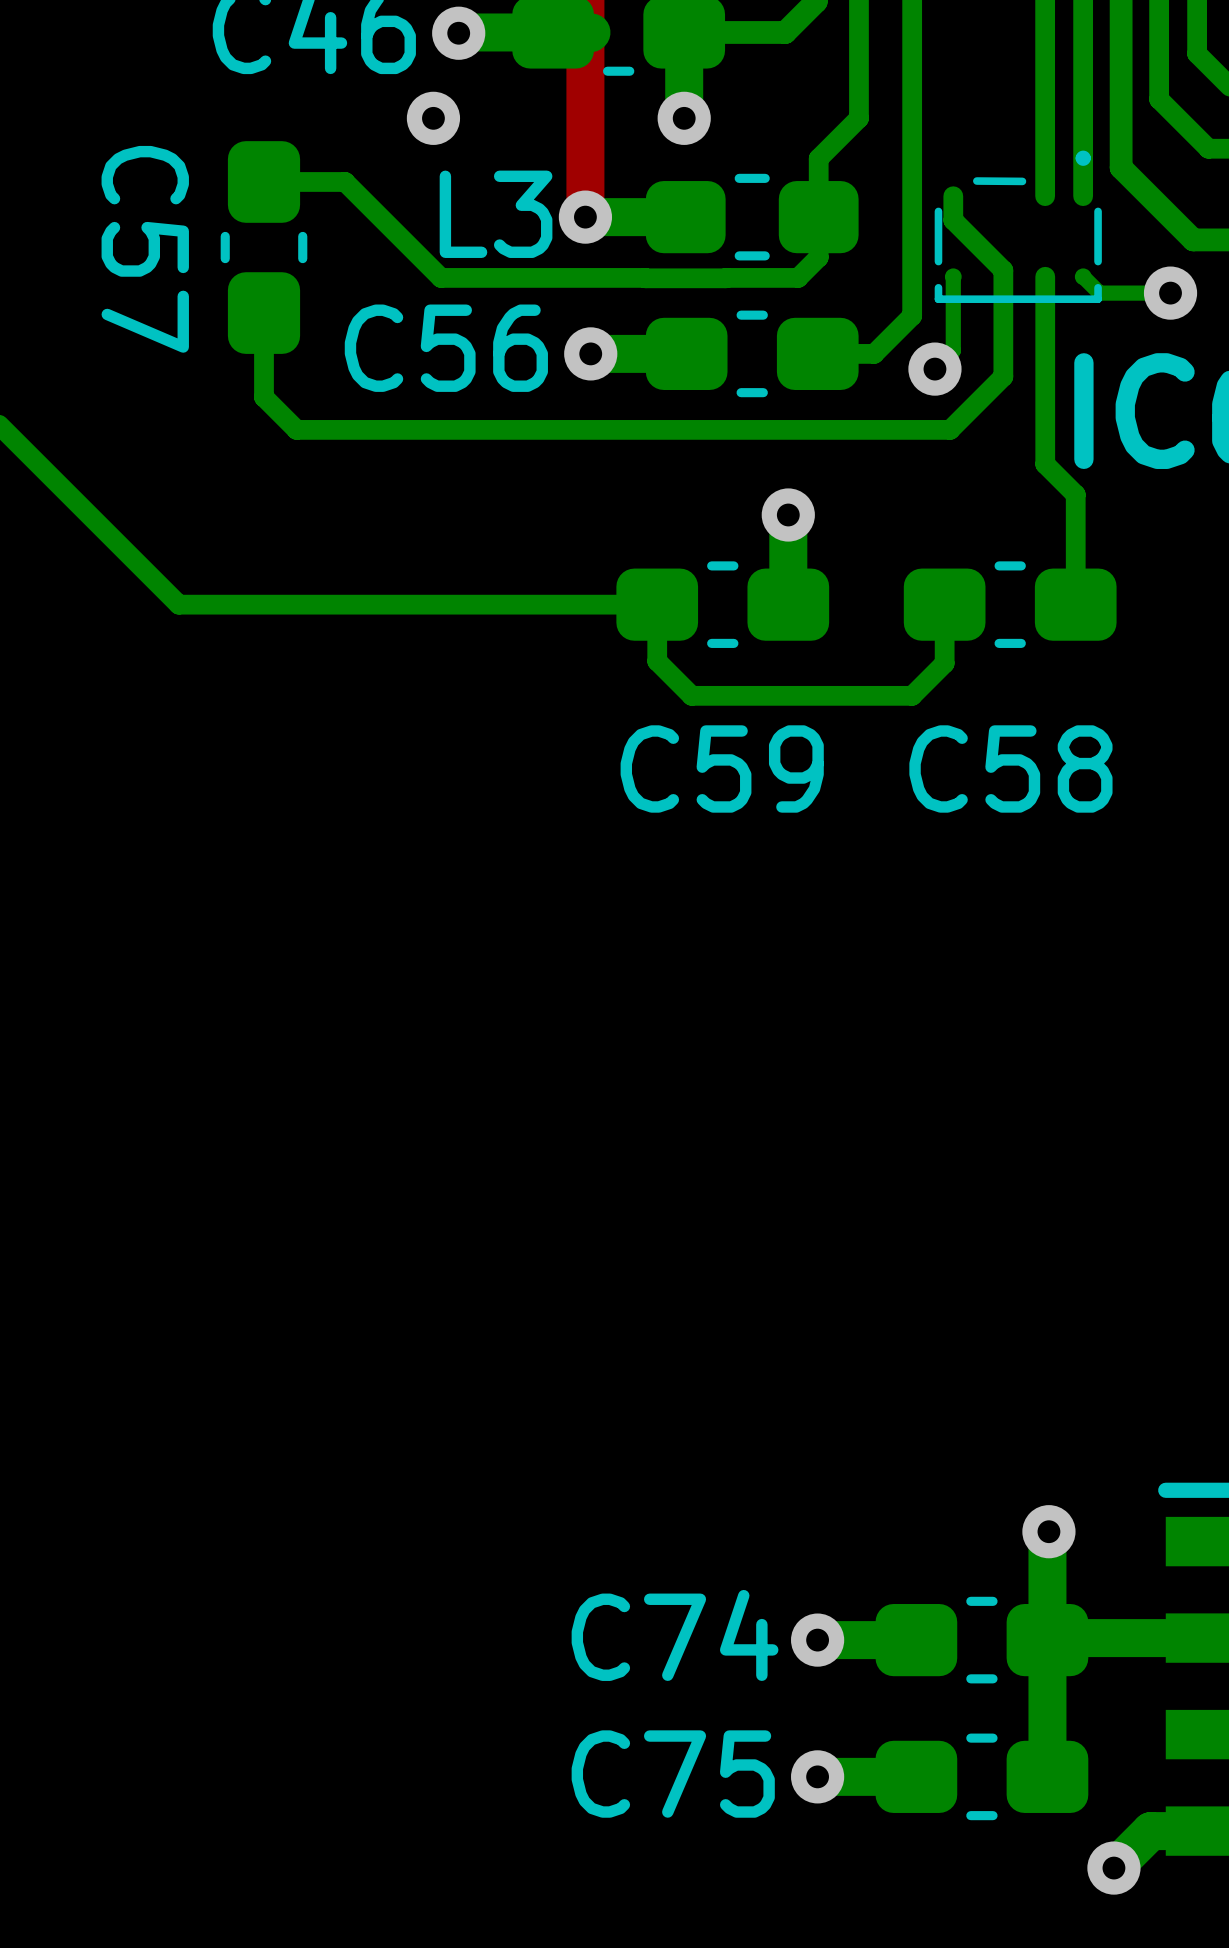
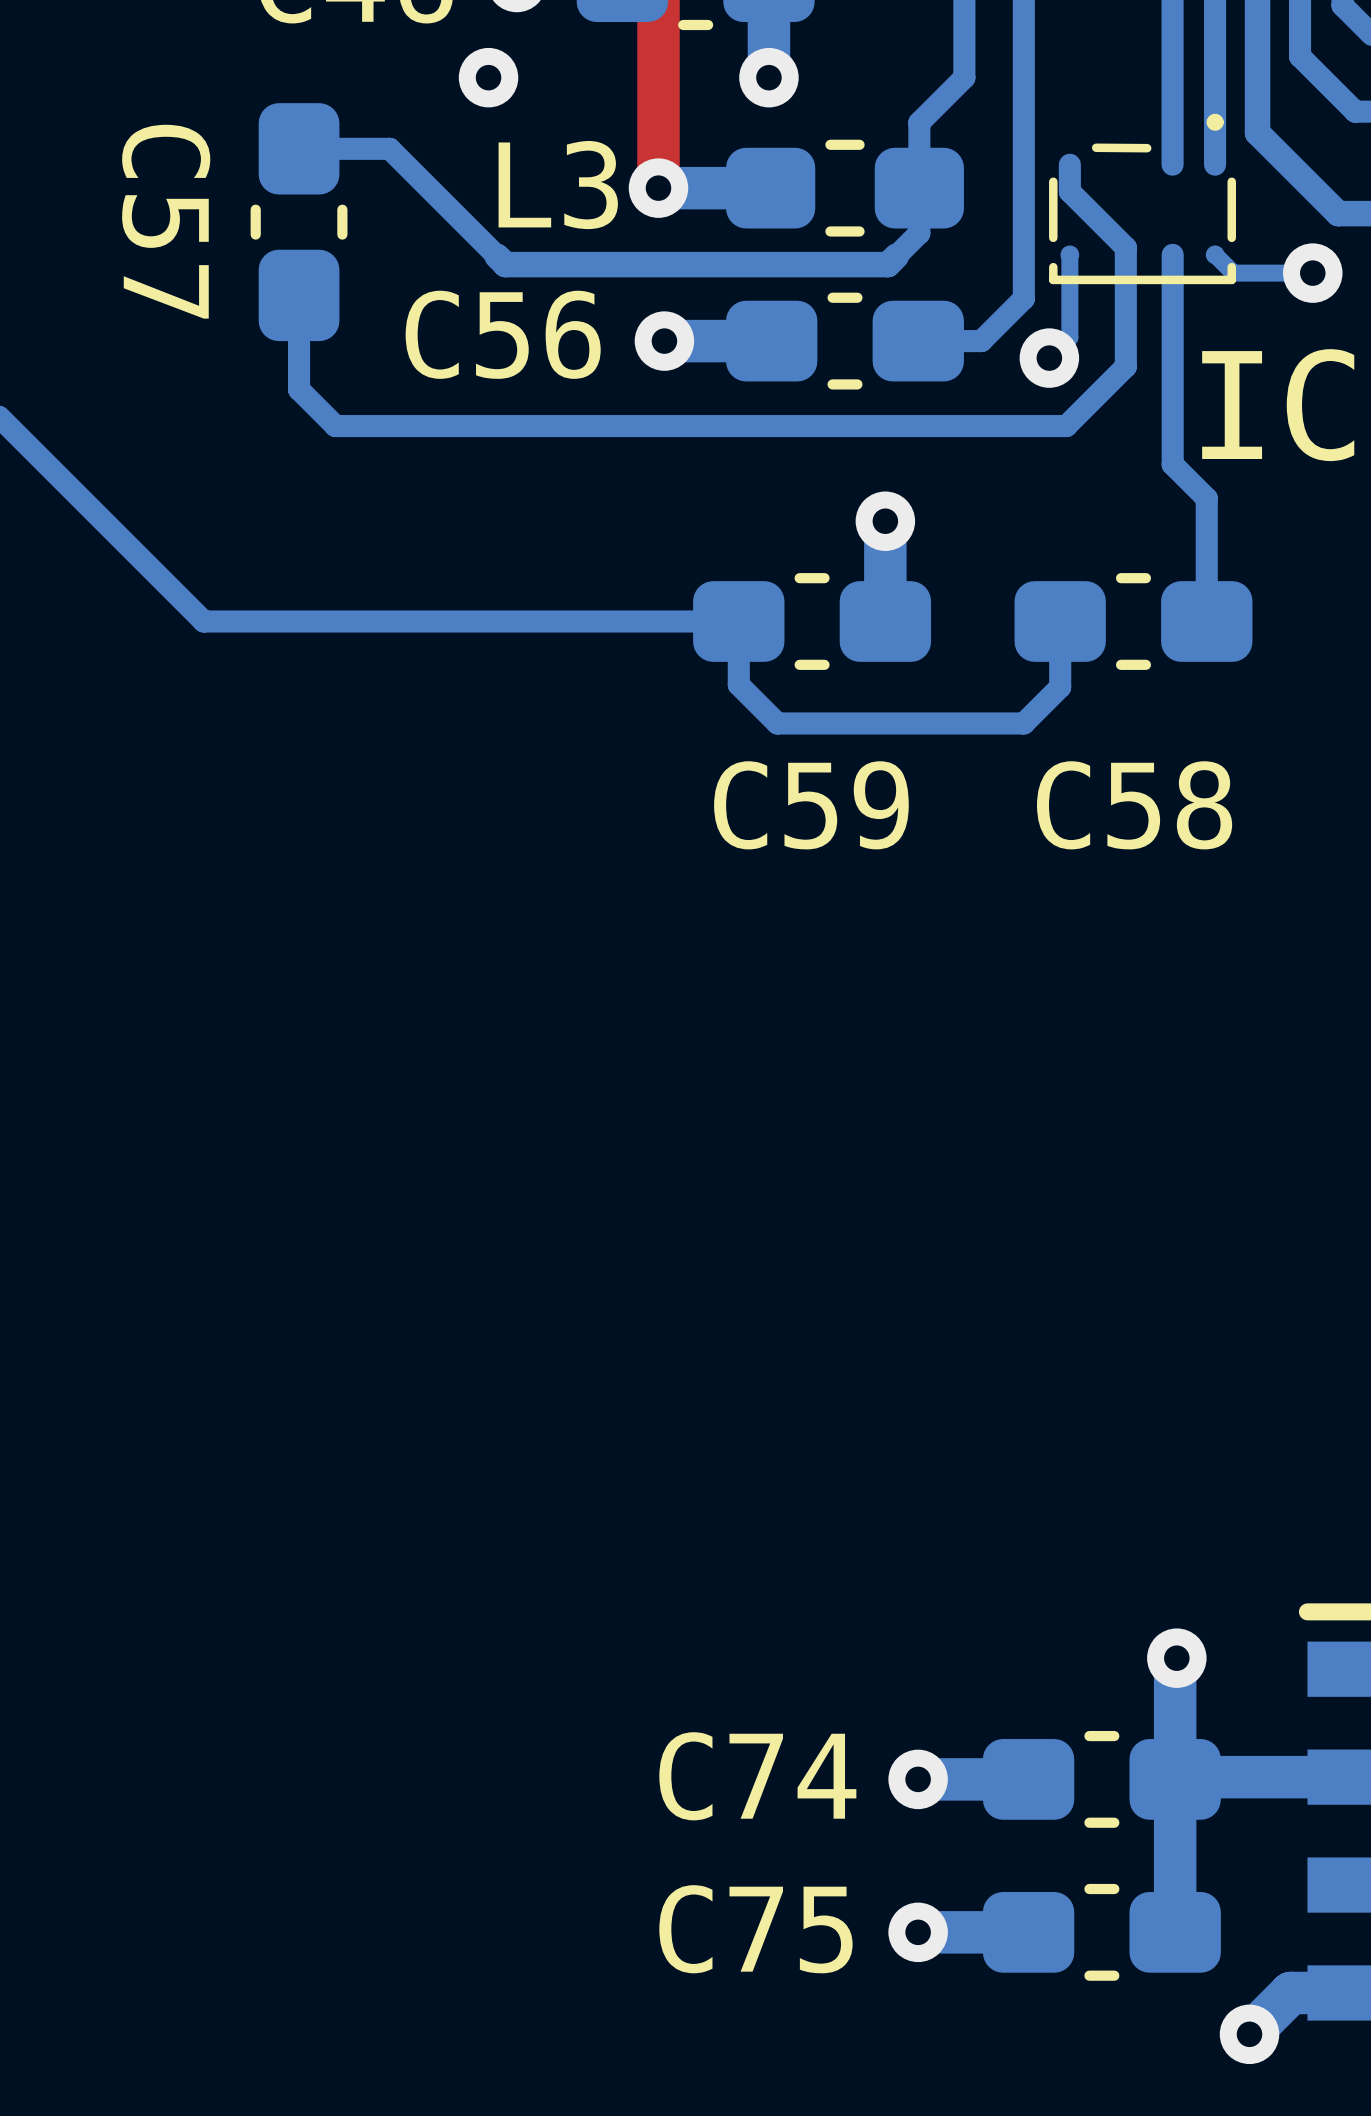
bottom track: (645, 277) (441, 277) -> (896, 256) (887, 264) (505, 264) (497, 256)
bottom track: (798, 277) (726, 277) -> none
bottom track: (725, 278) (645, 278) -> none

